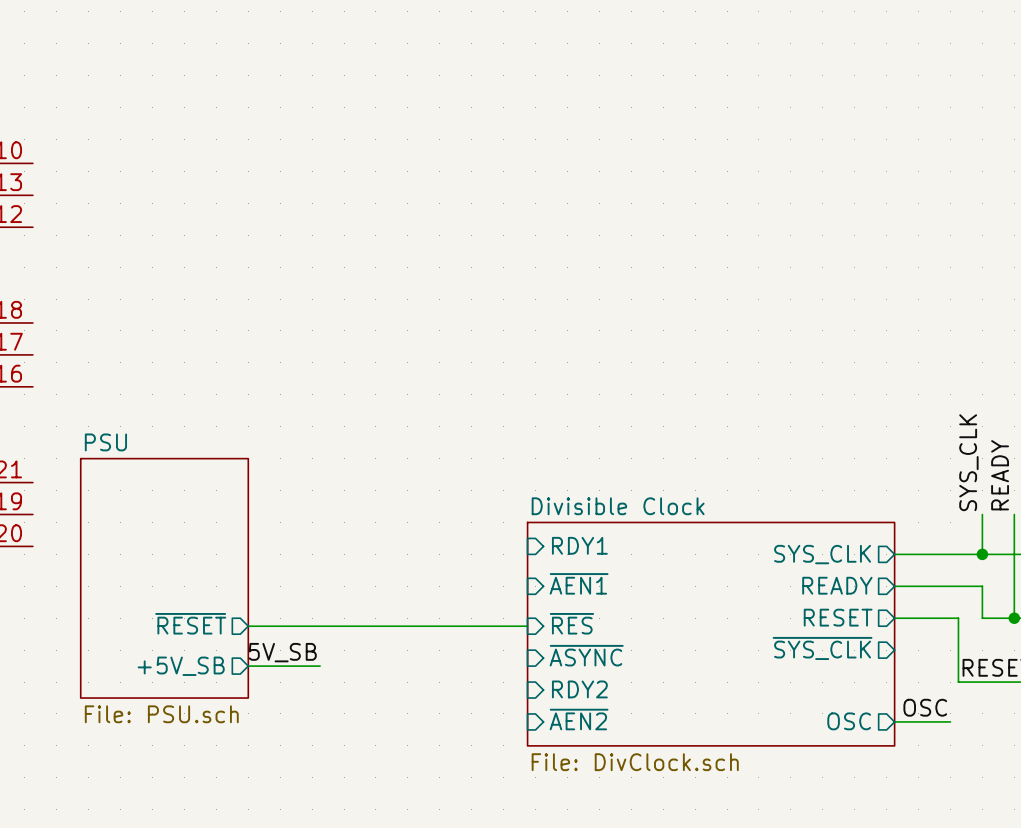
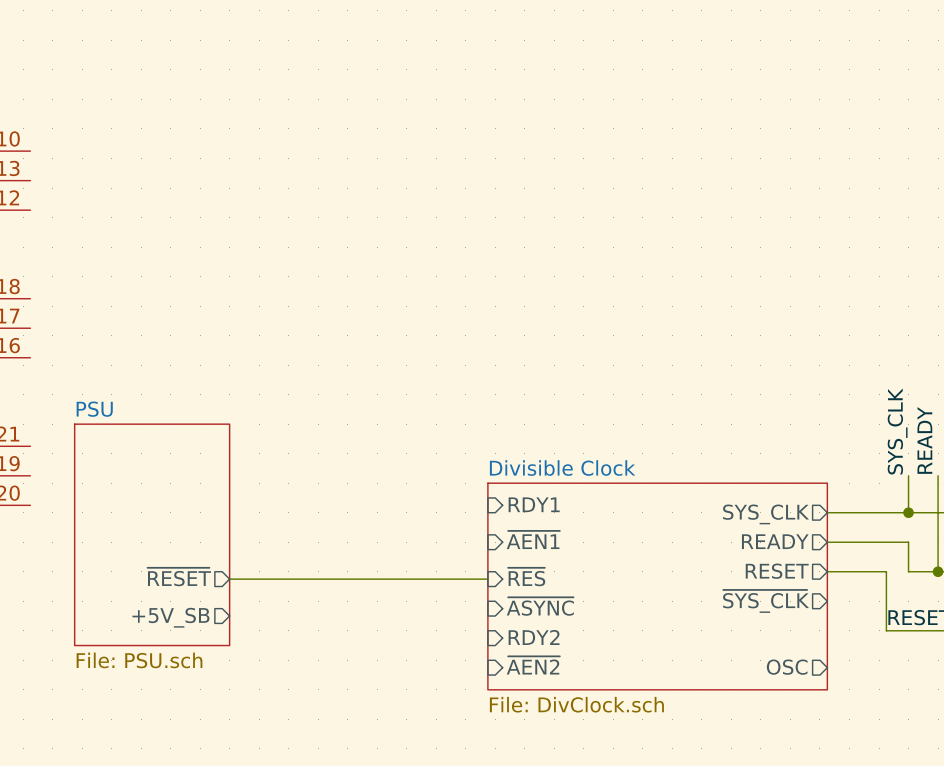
label: 5V_SB (282, 652) -> none
wire: (248, 666) (320, 666) -> none
label: OSC (925, 707) -> none
wire: (894, 721) (950, 721) -> none

